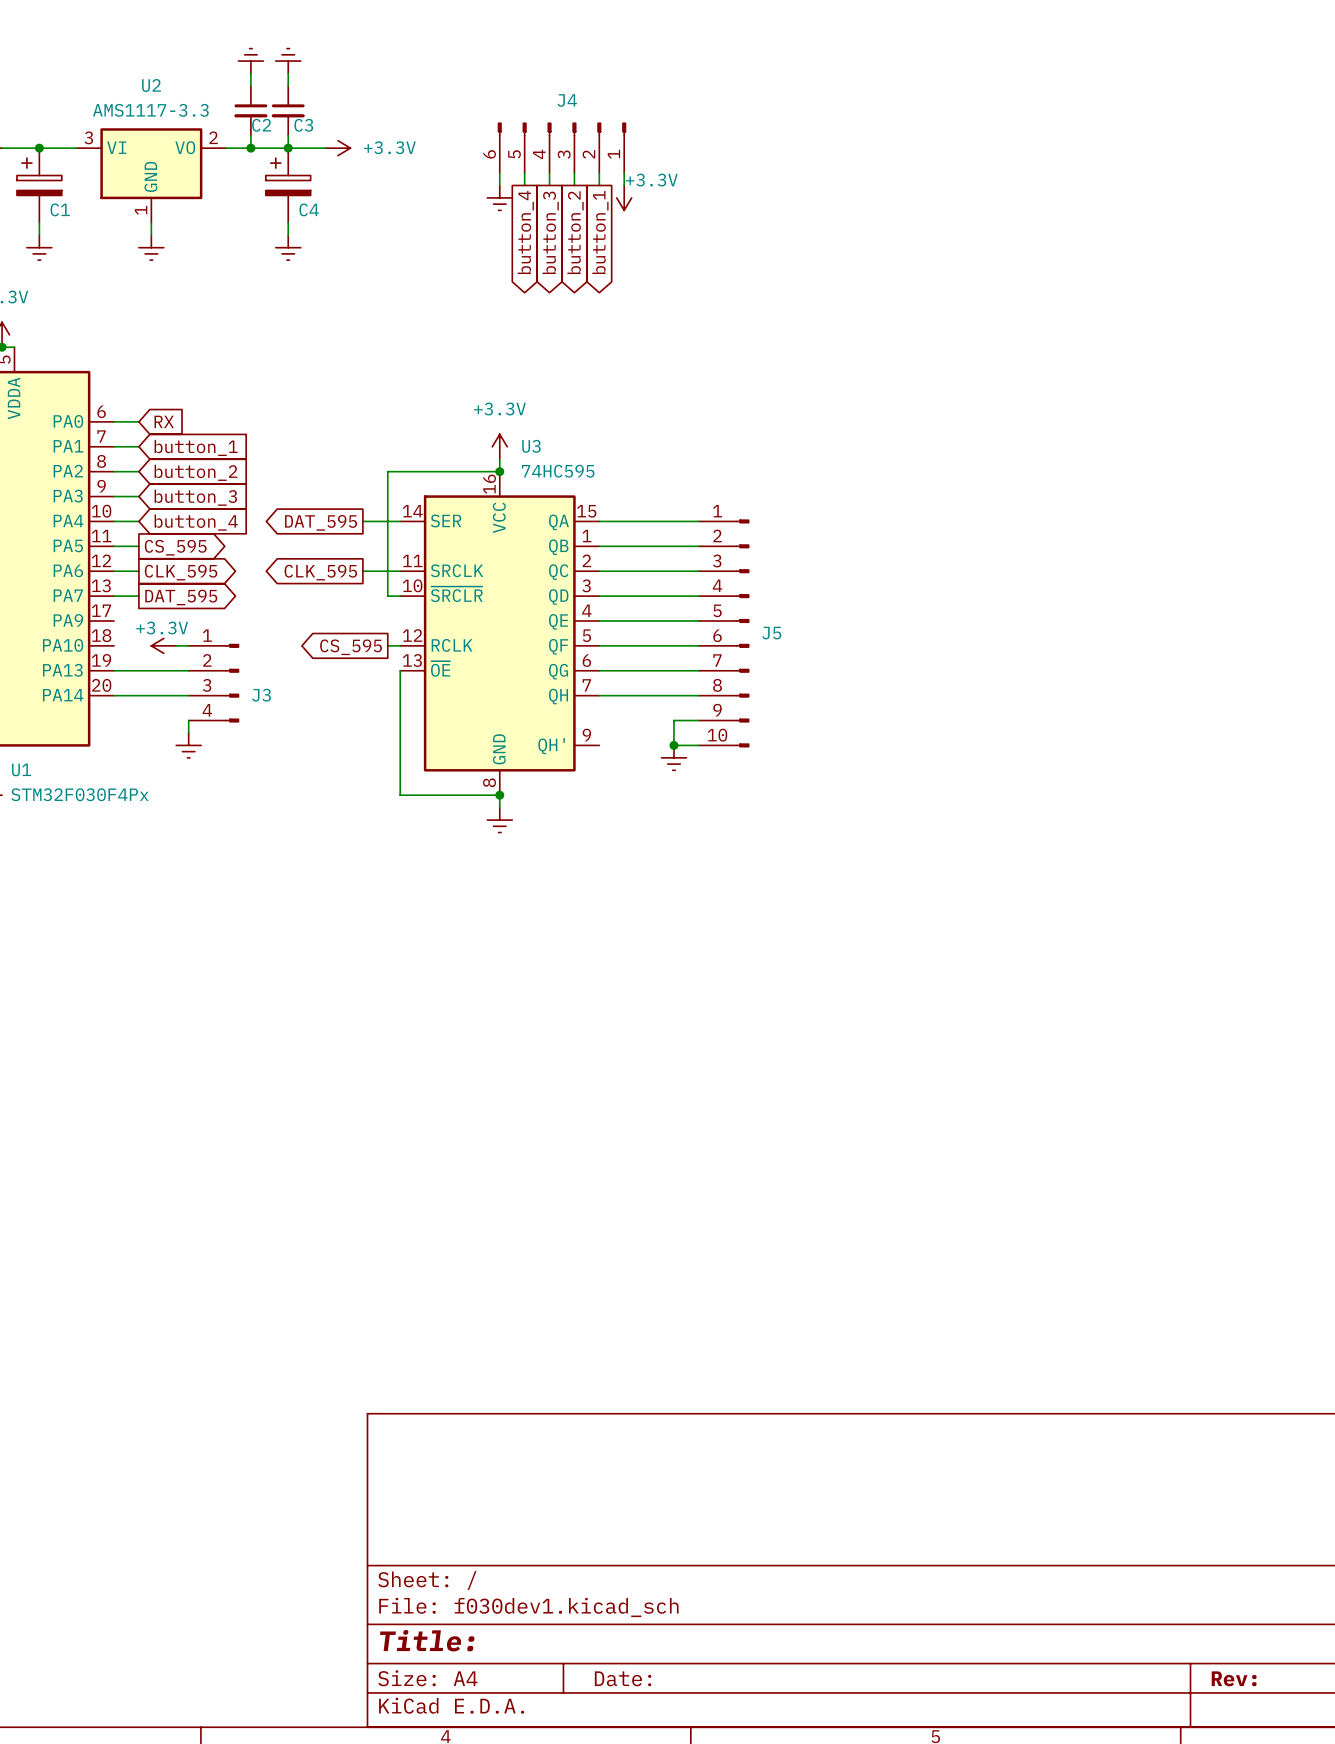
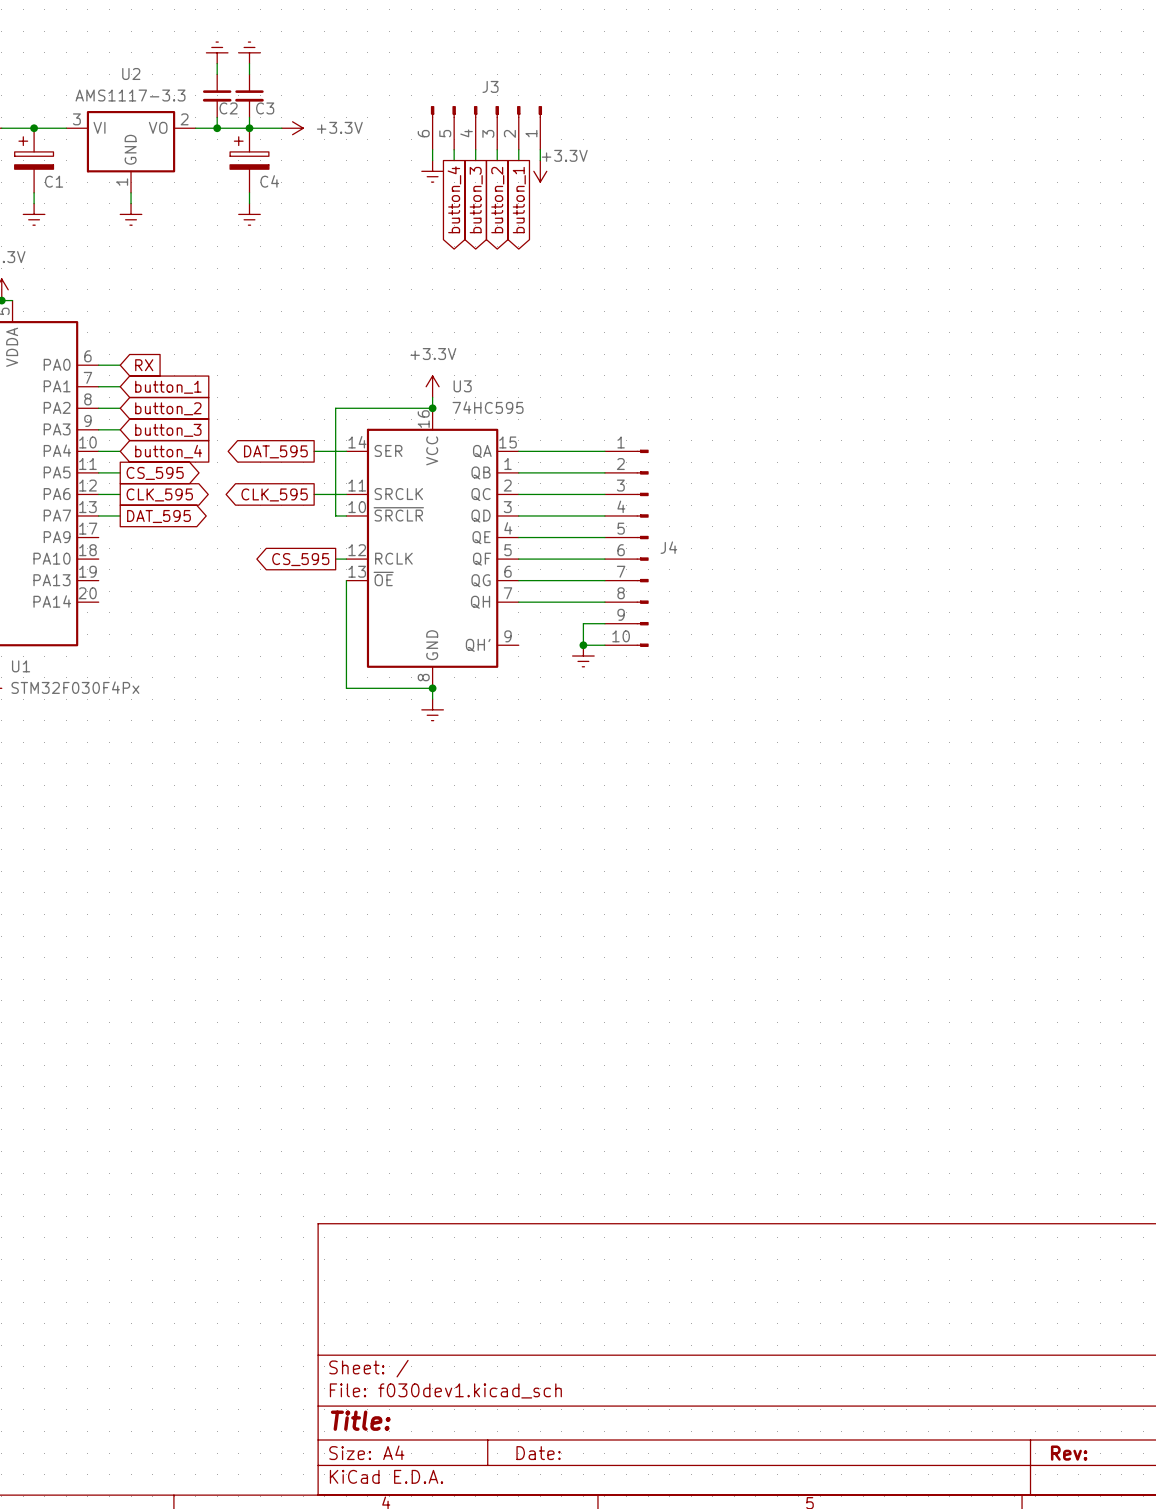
J4 name: J4 (567, 100) -> J3 (490, 86)
J5 name: J5 (771, 633) -> J4 (668, 547)
power symbol: +3.3V (163, 645) -> none
wire: (176, 645) (188, 645) -> none
wire: (114, 670) (188, 670) -> none
J3: (213, 683) -> none
wire: (114, 695) (188, 695) -> none
wire: (188, 720) (188, 732) -> none
power symbol: (188, 745) -> none

